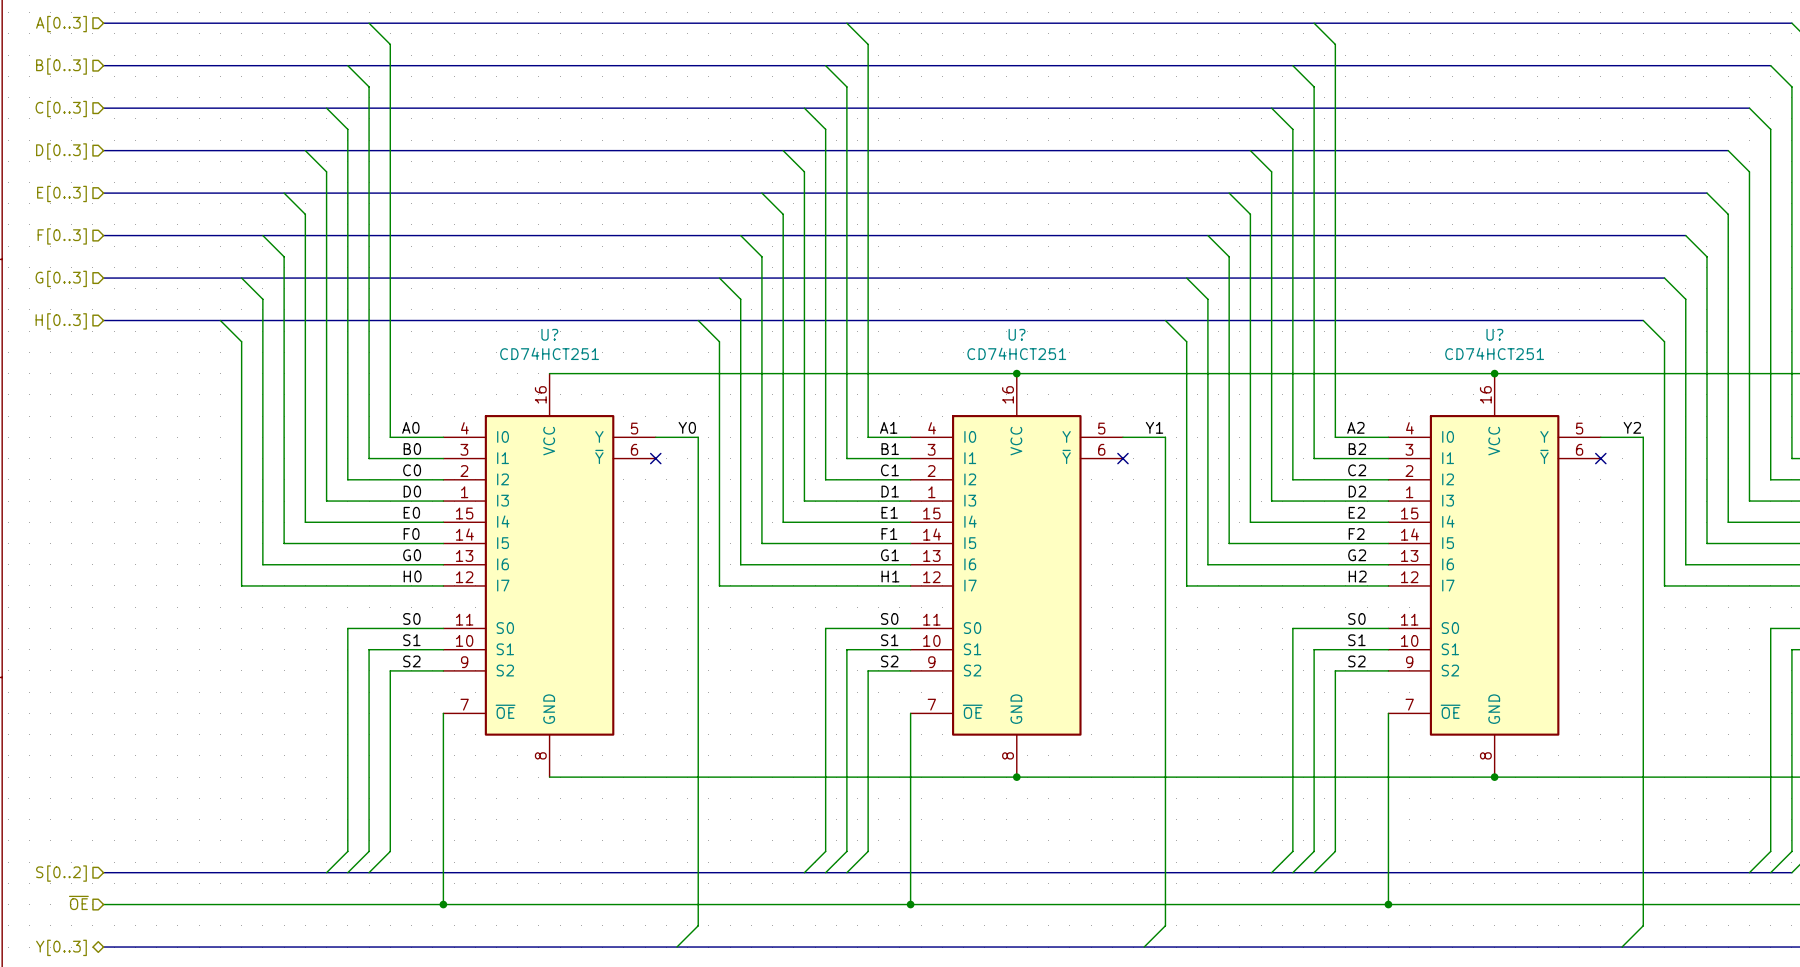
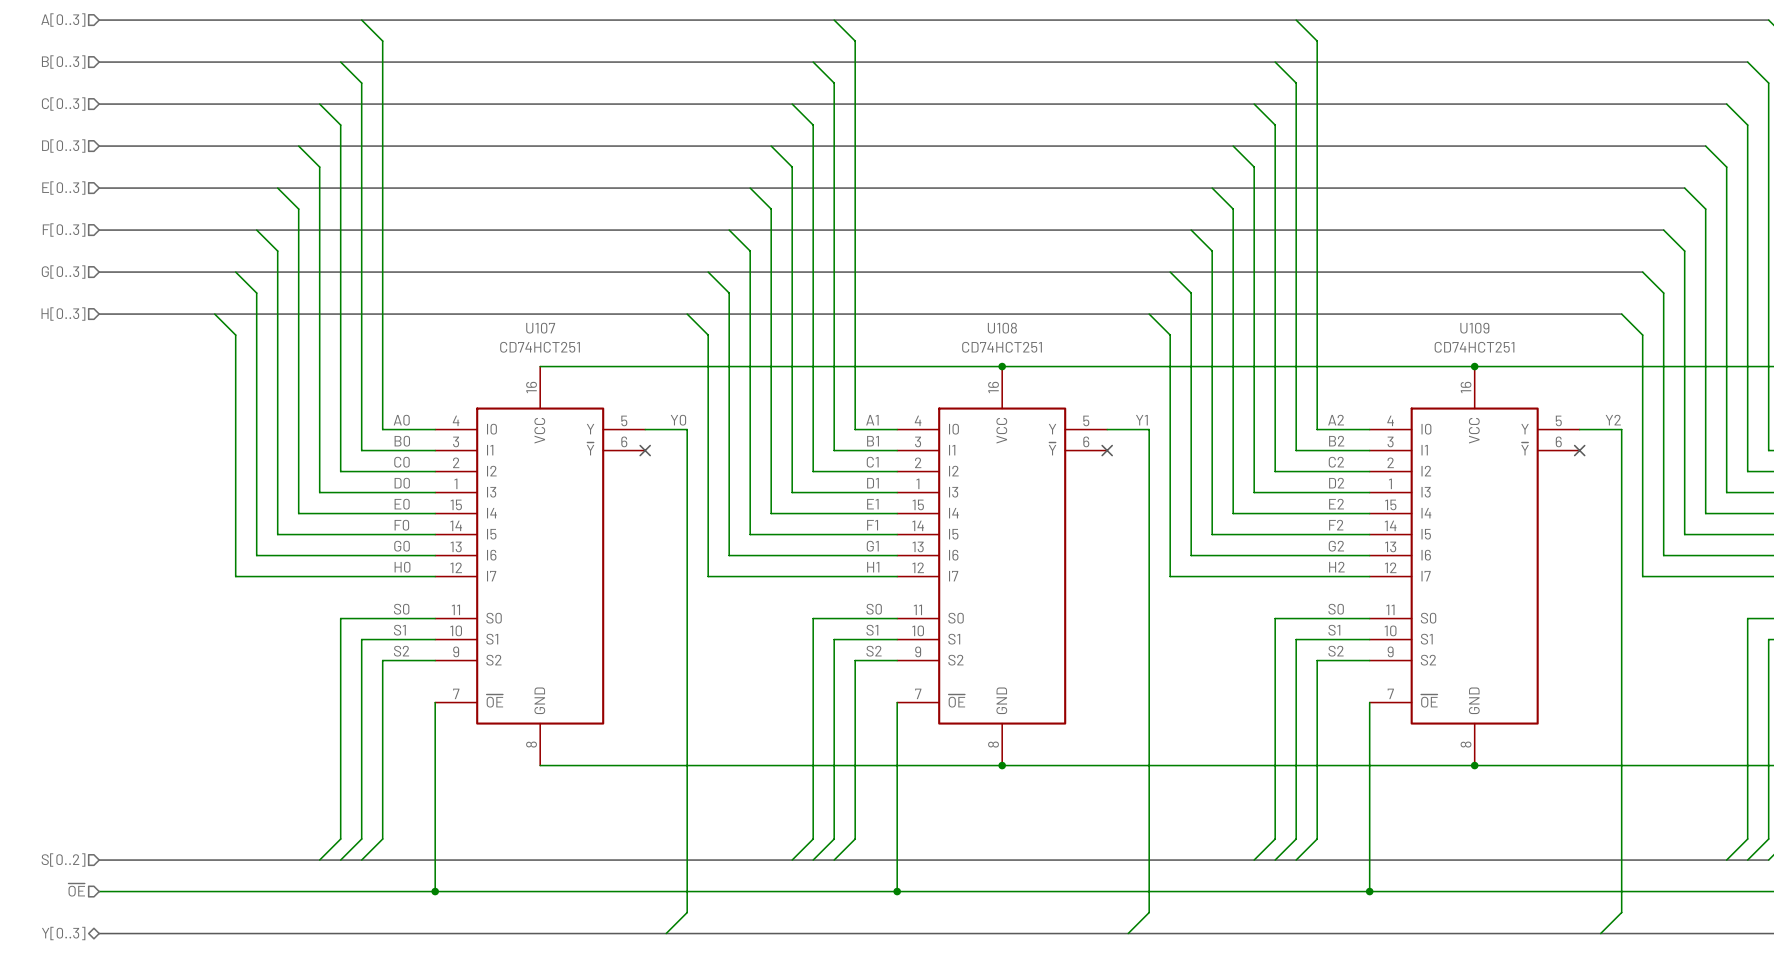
U? name: U? (549, 334) -> U107 (540, 328)
U? name: U? (1017, 334) -> U108 (1002, 328)
U? name: U? (1494, 334) -> U109 (1474, 328)

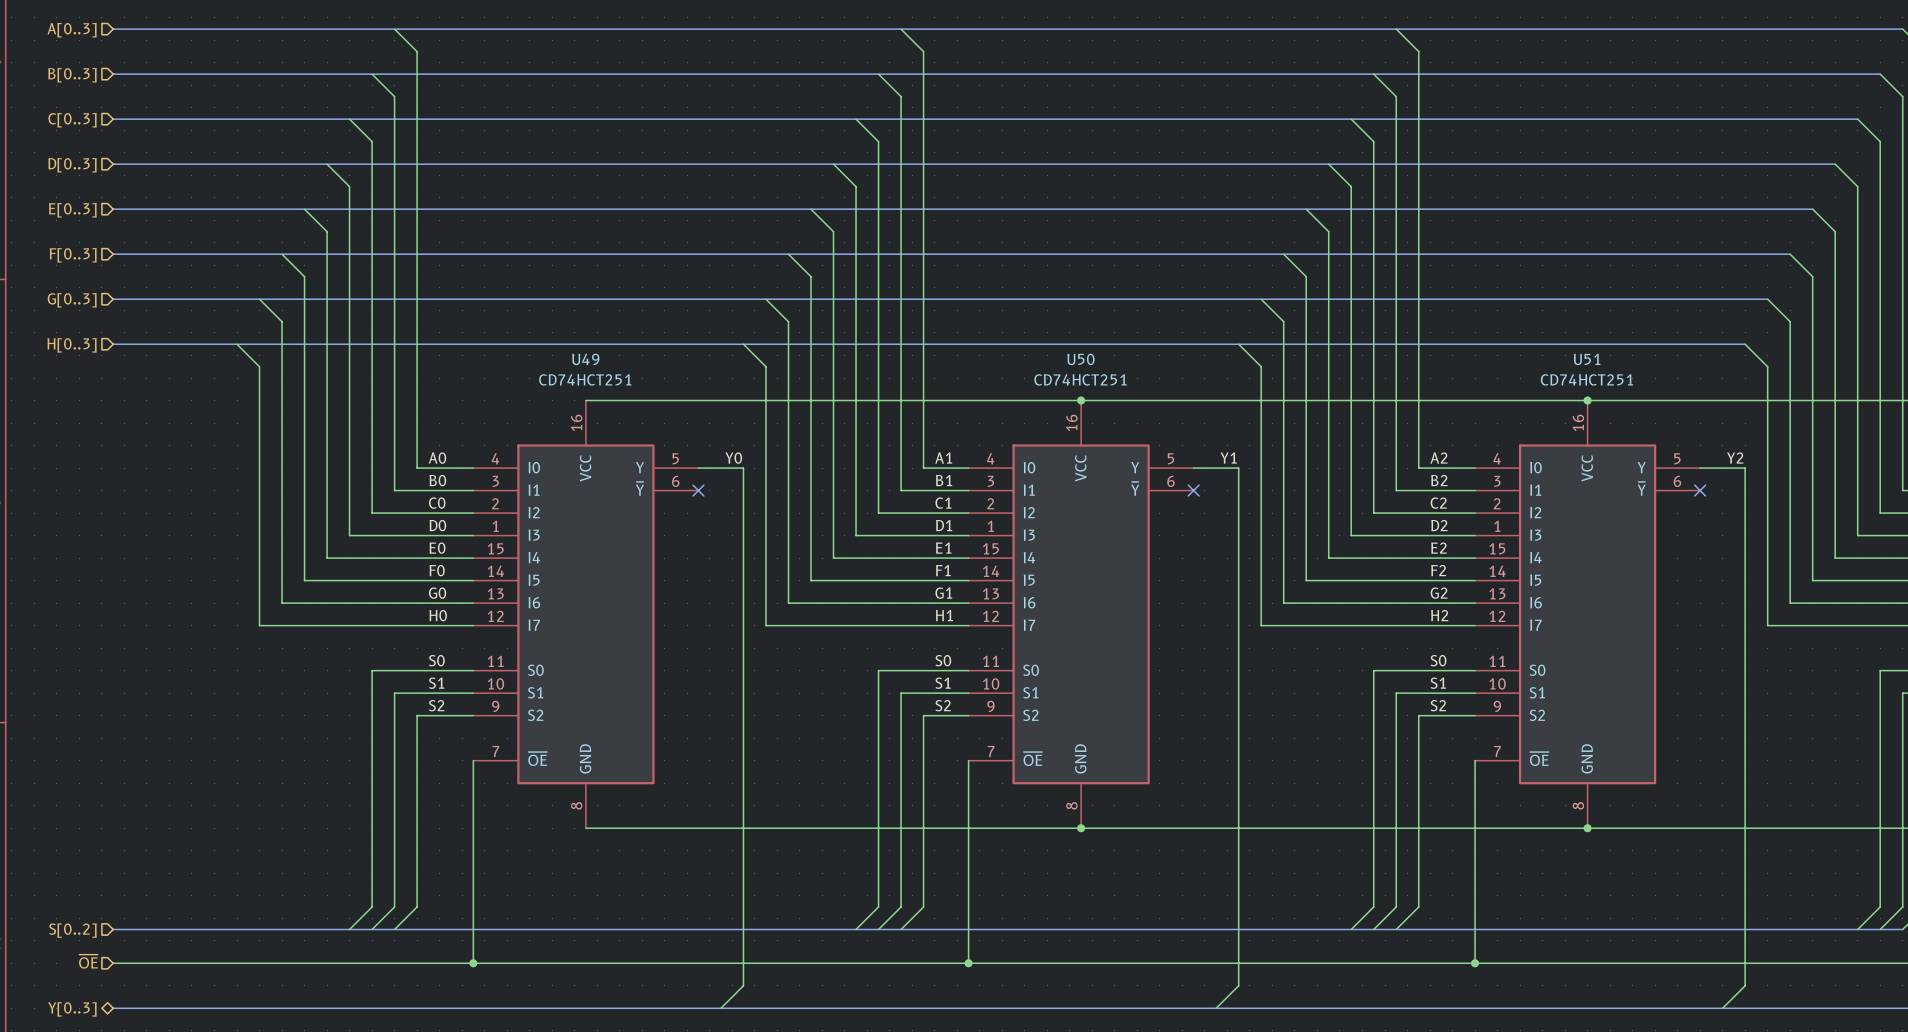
U107 name: U107 (540, 328) -> U49 (585, 359)
U108 name: U108 (1002, 328) -> U50 (1080, 359)
U109 name: U109 (1474, 328) -> U51 (1587, 359)

